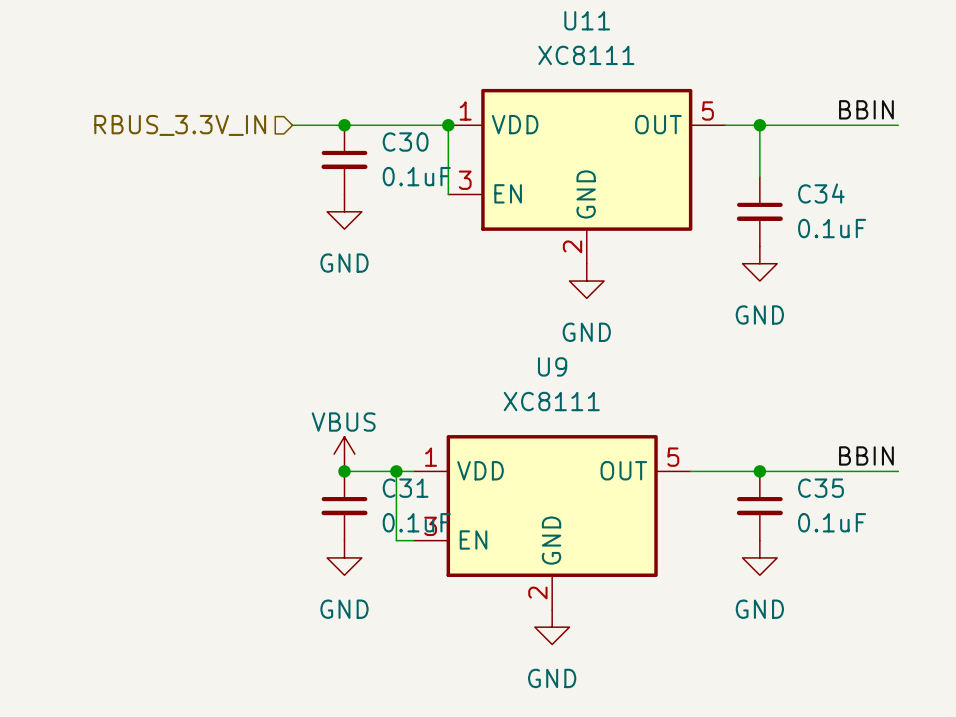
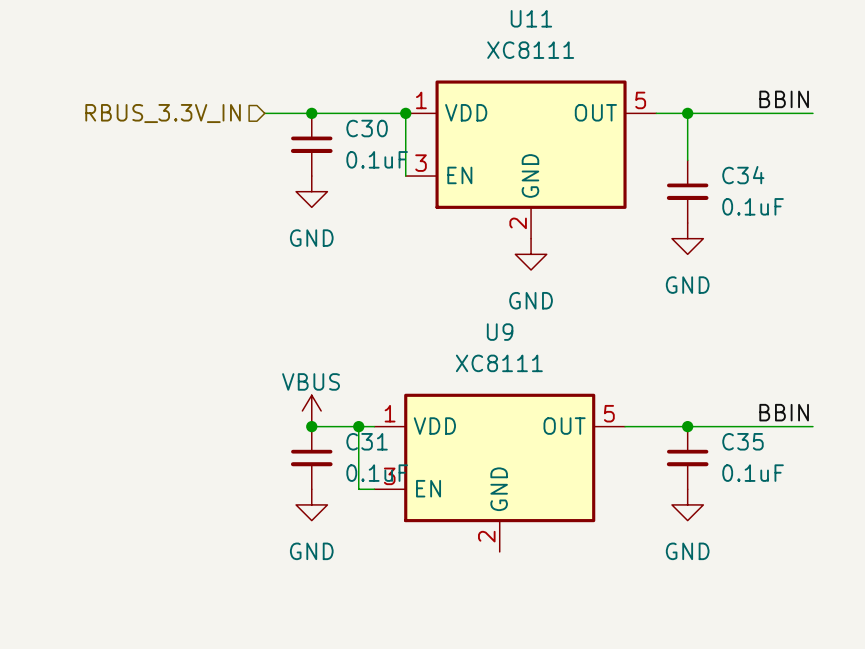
power symbol: GND (552, 627) -> none

